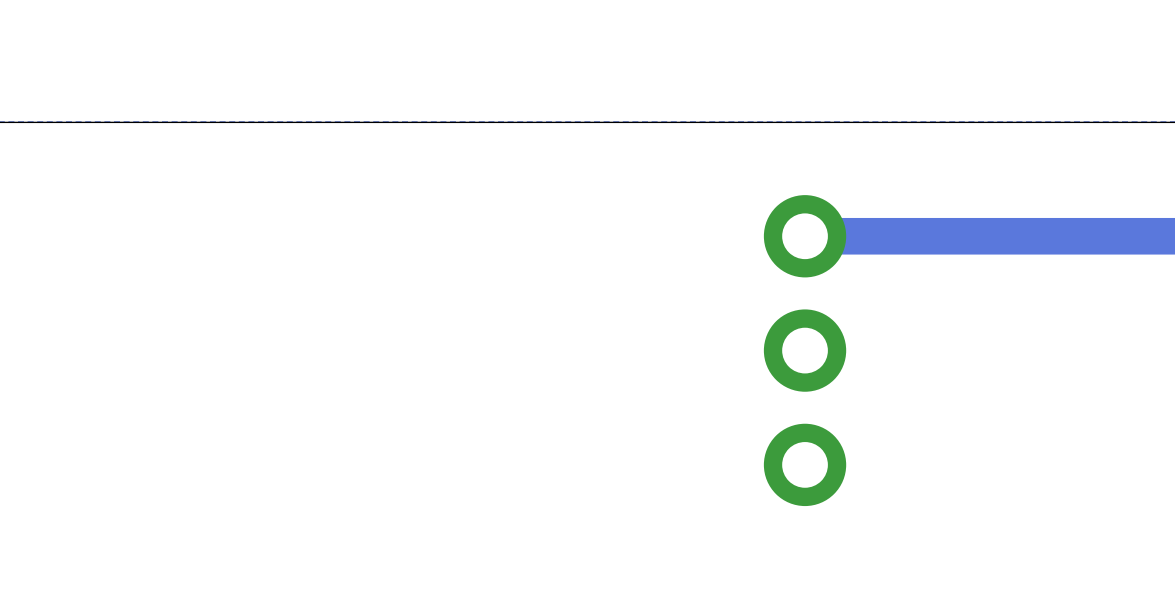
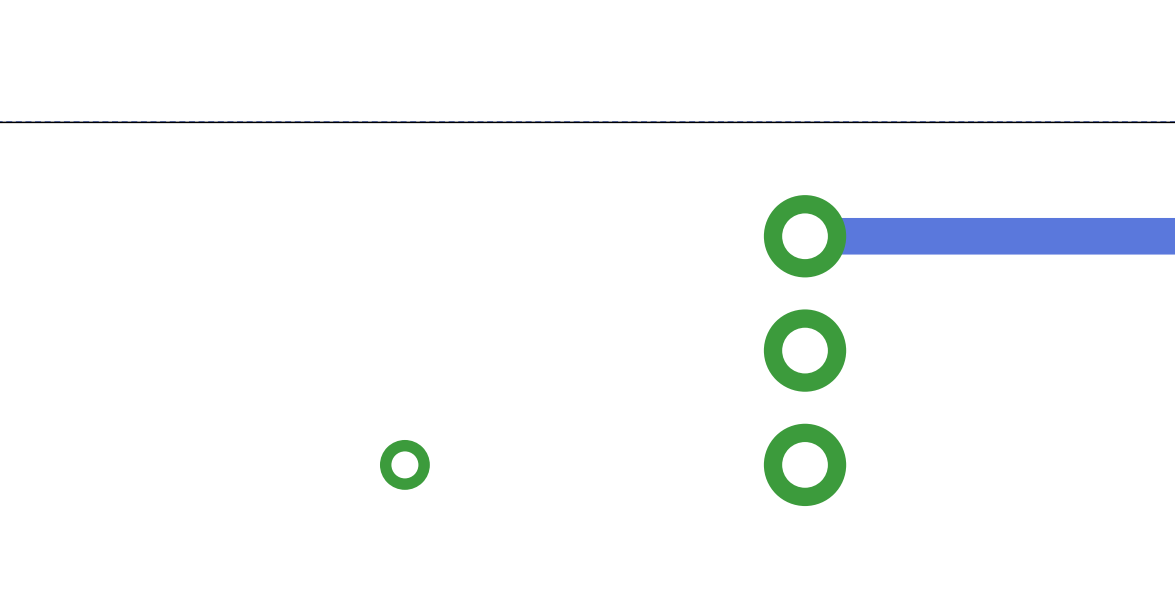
via: none -> (404, 464)

